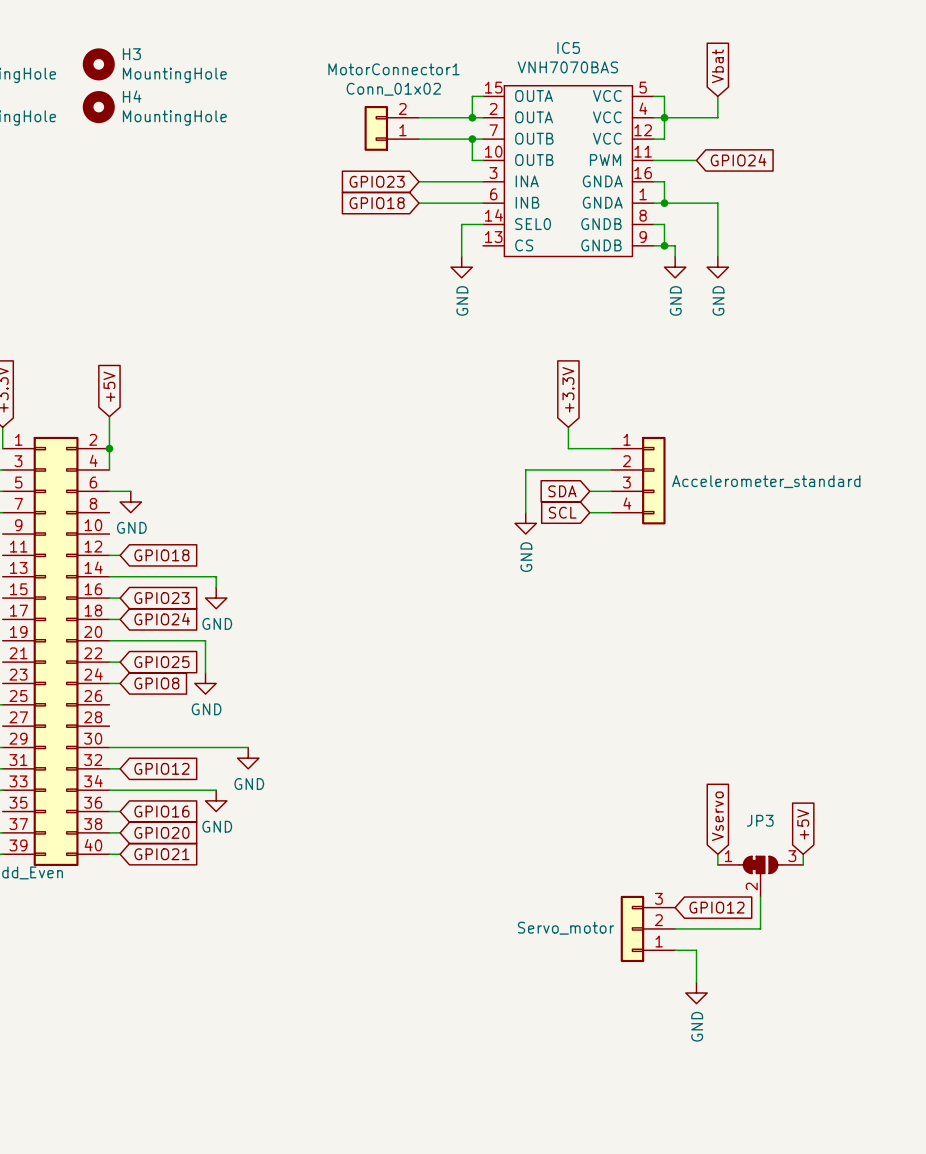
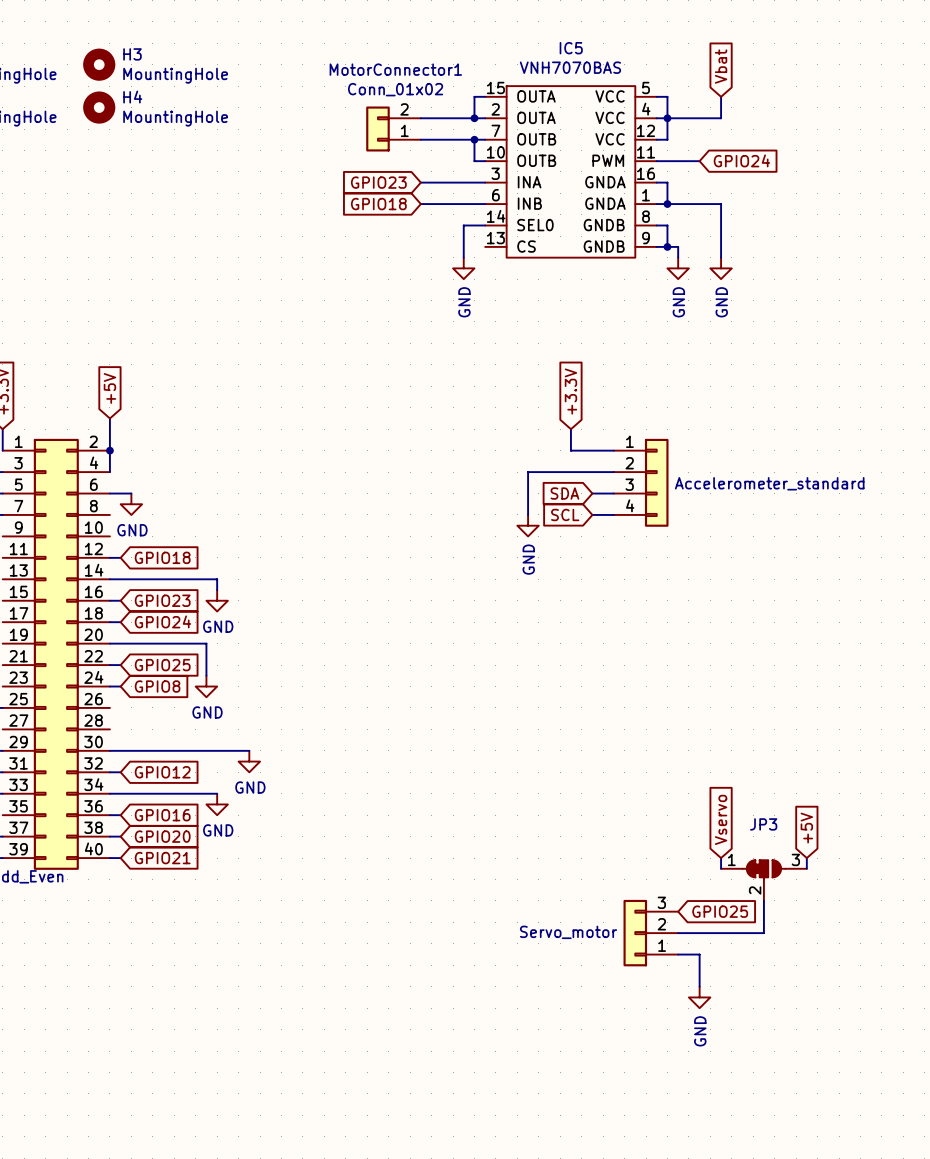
global label: GPIO12 (716, 907) -> GPIO25 (720, 911)

